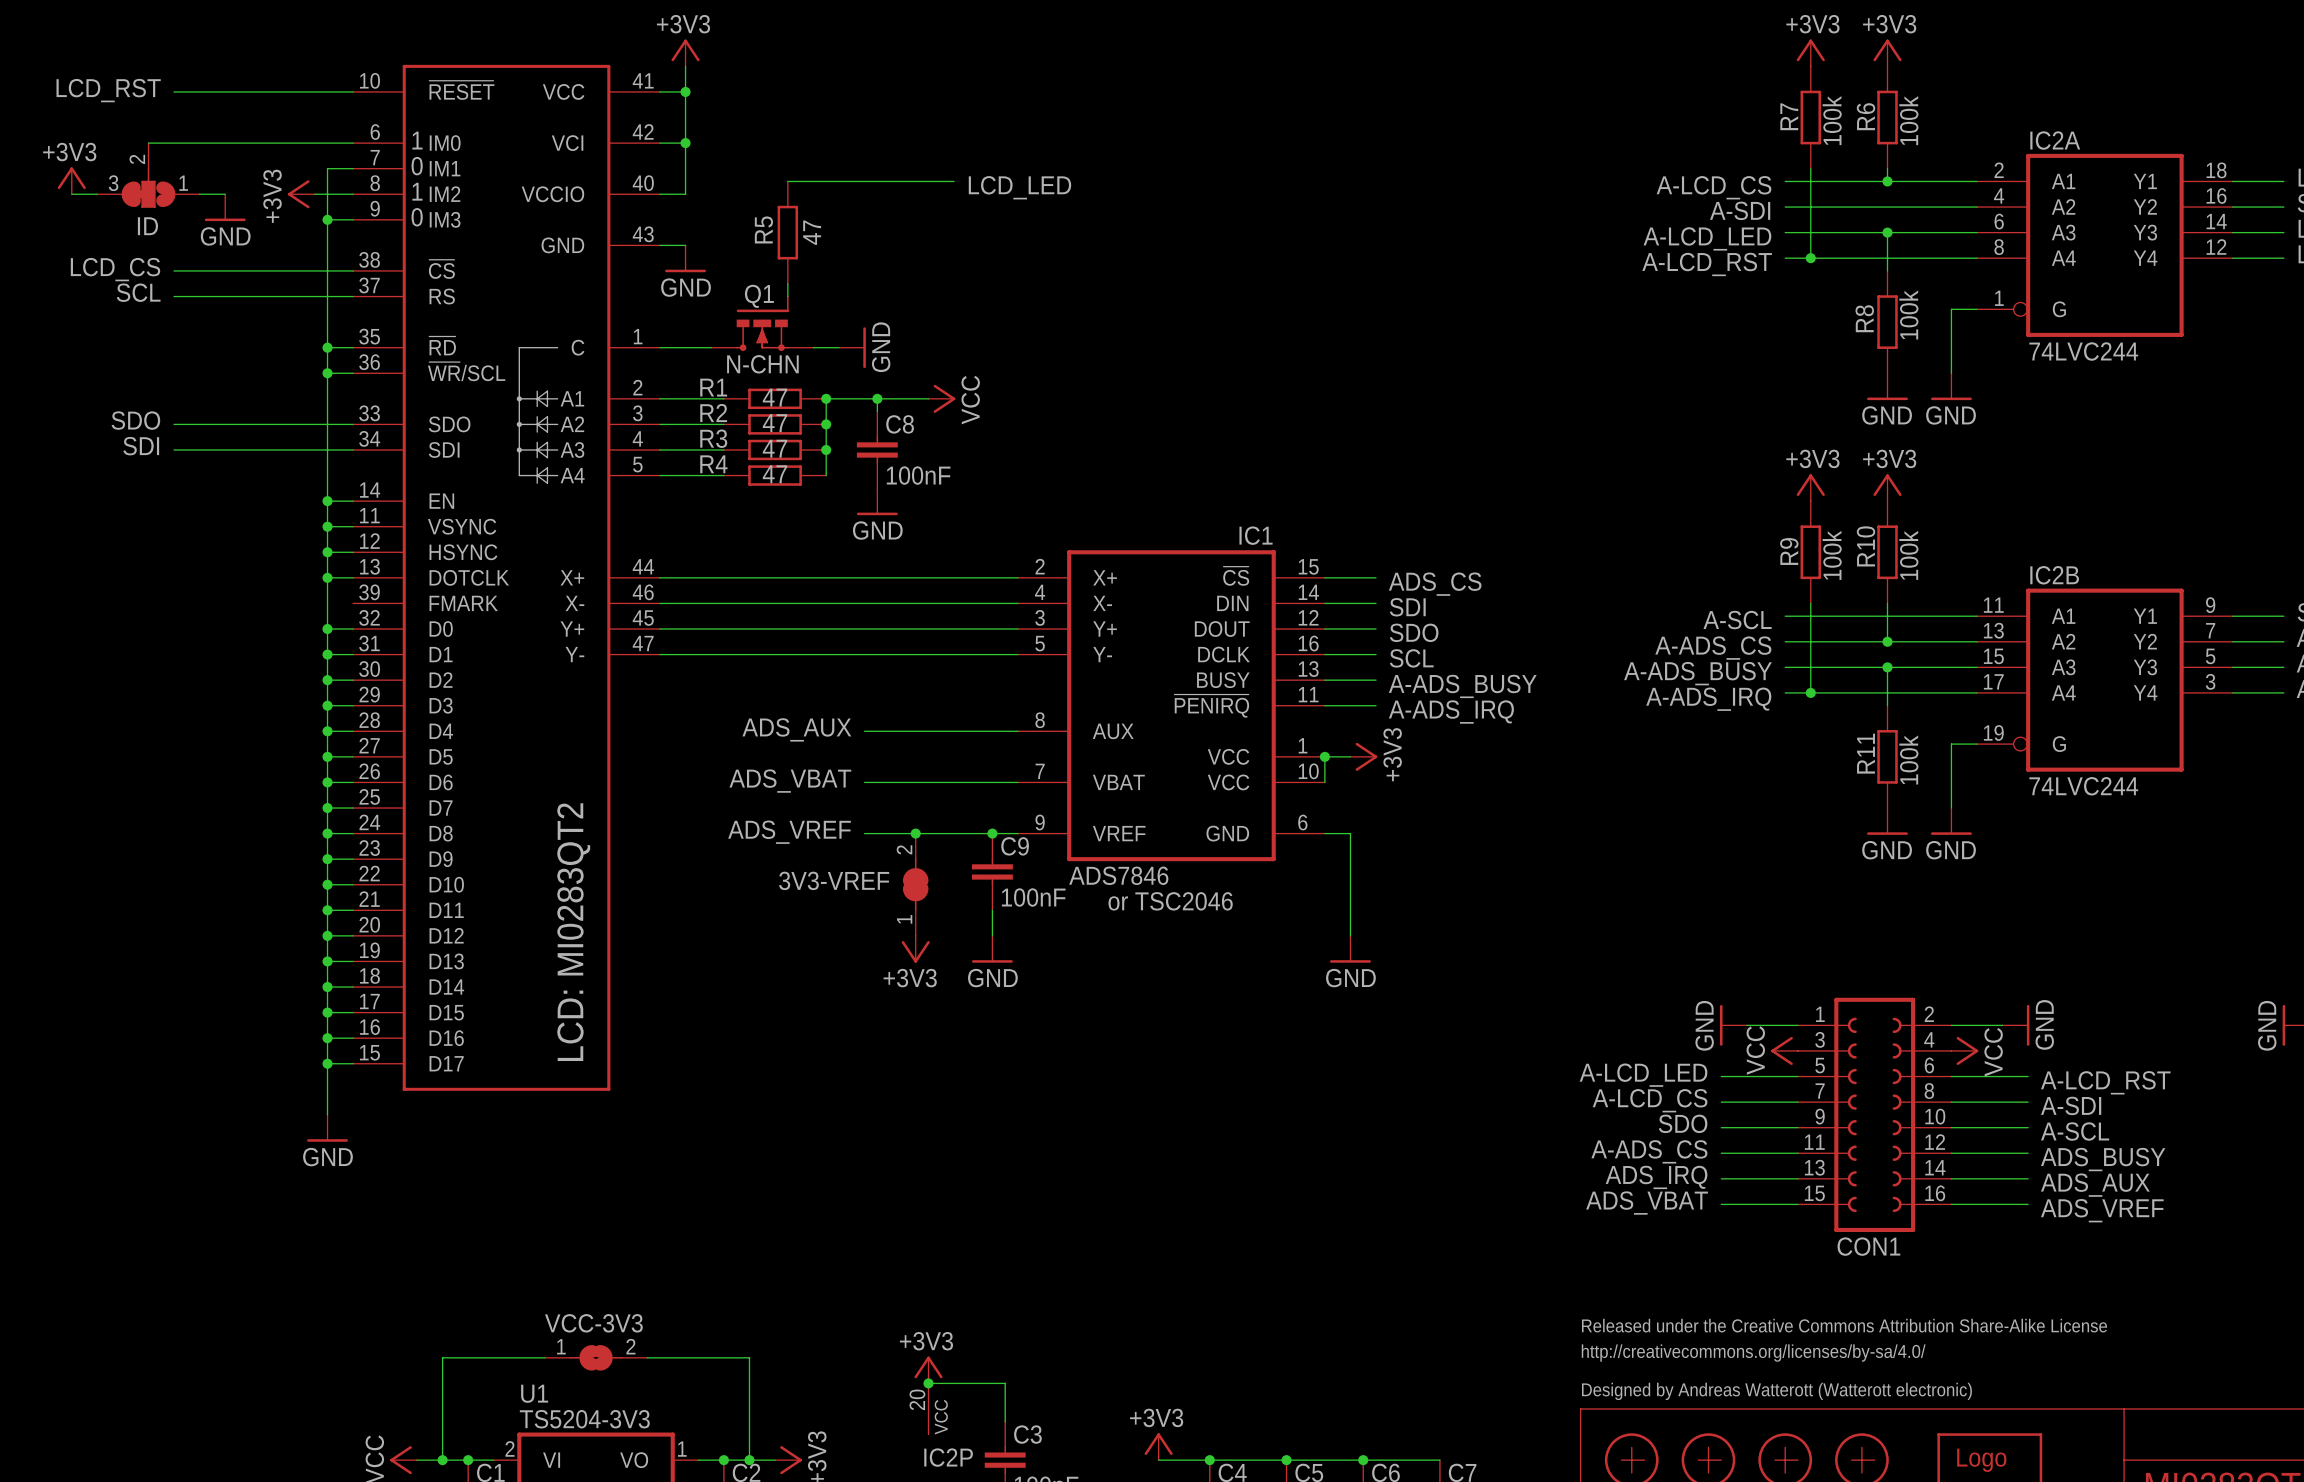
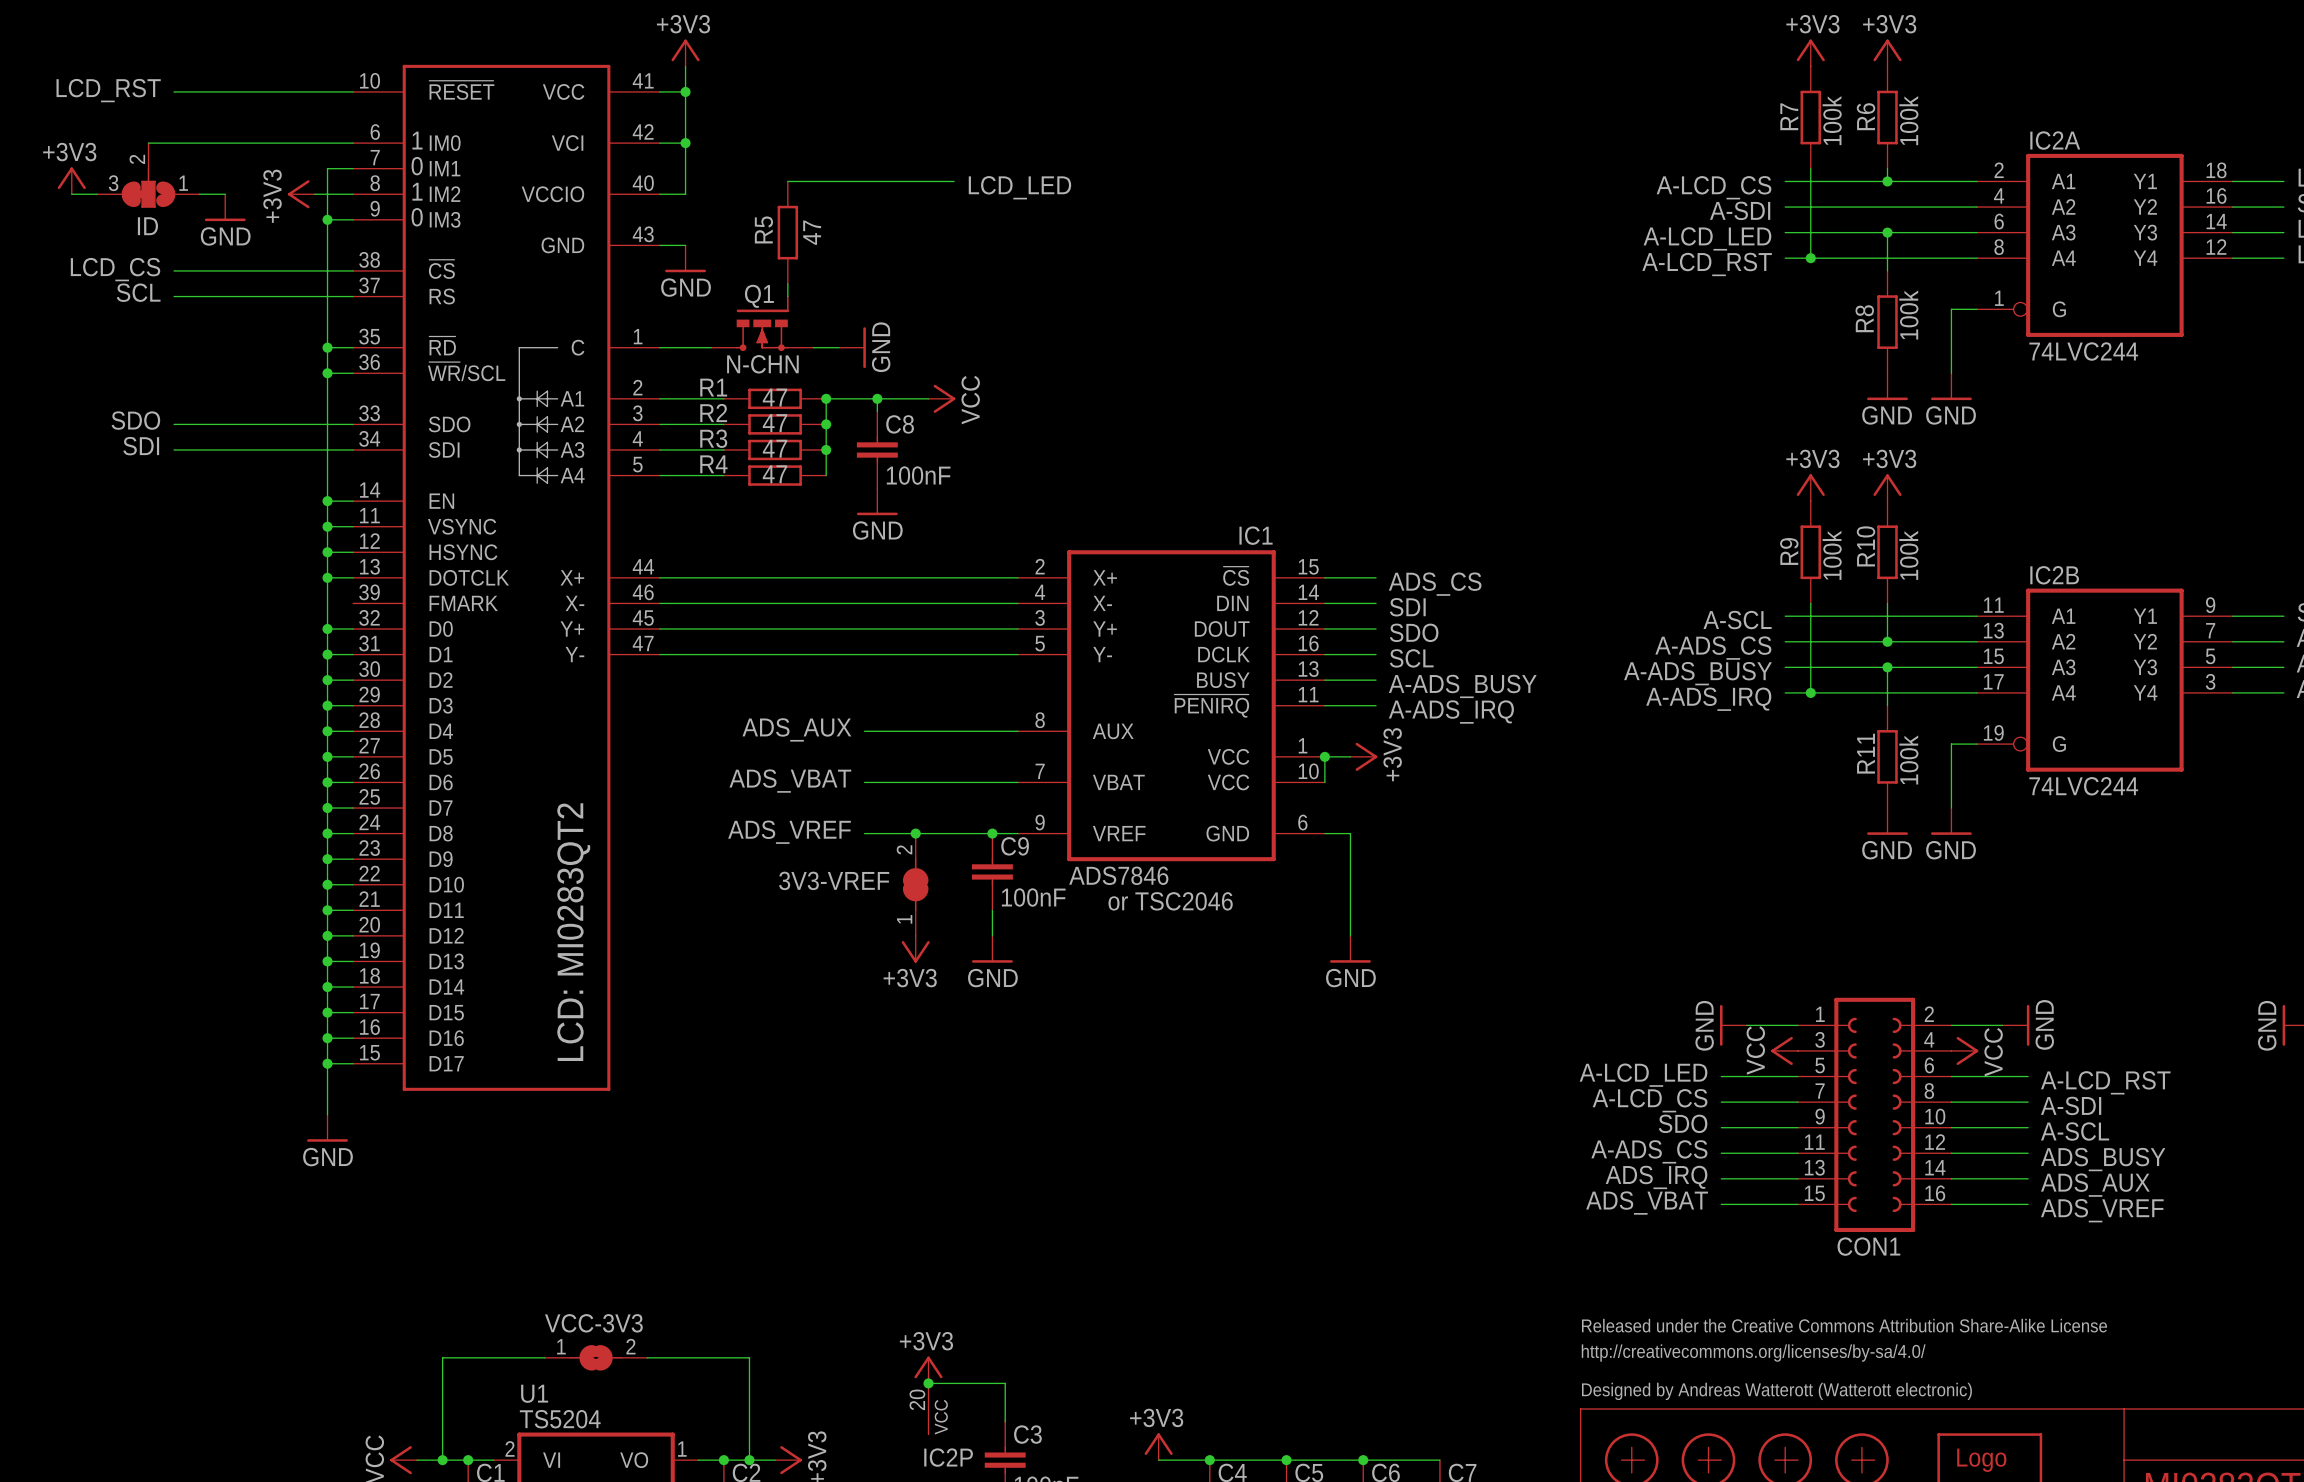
U1 value: TS5204-3V3 (584, 1419) -> TS5204 (560, 1419)

